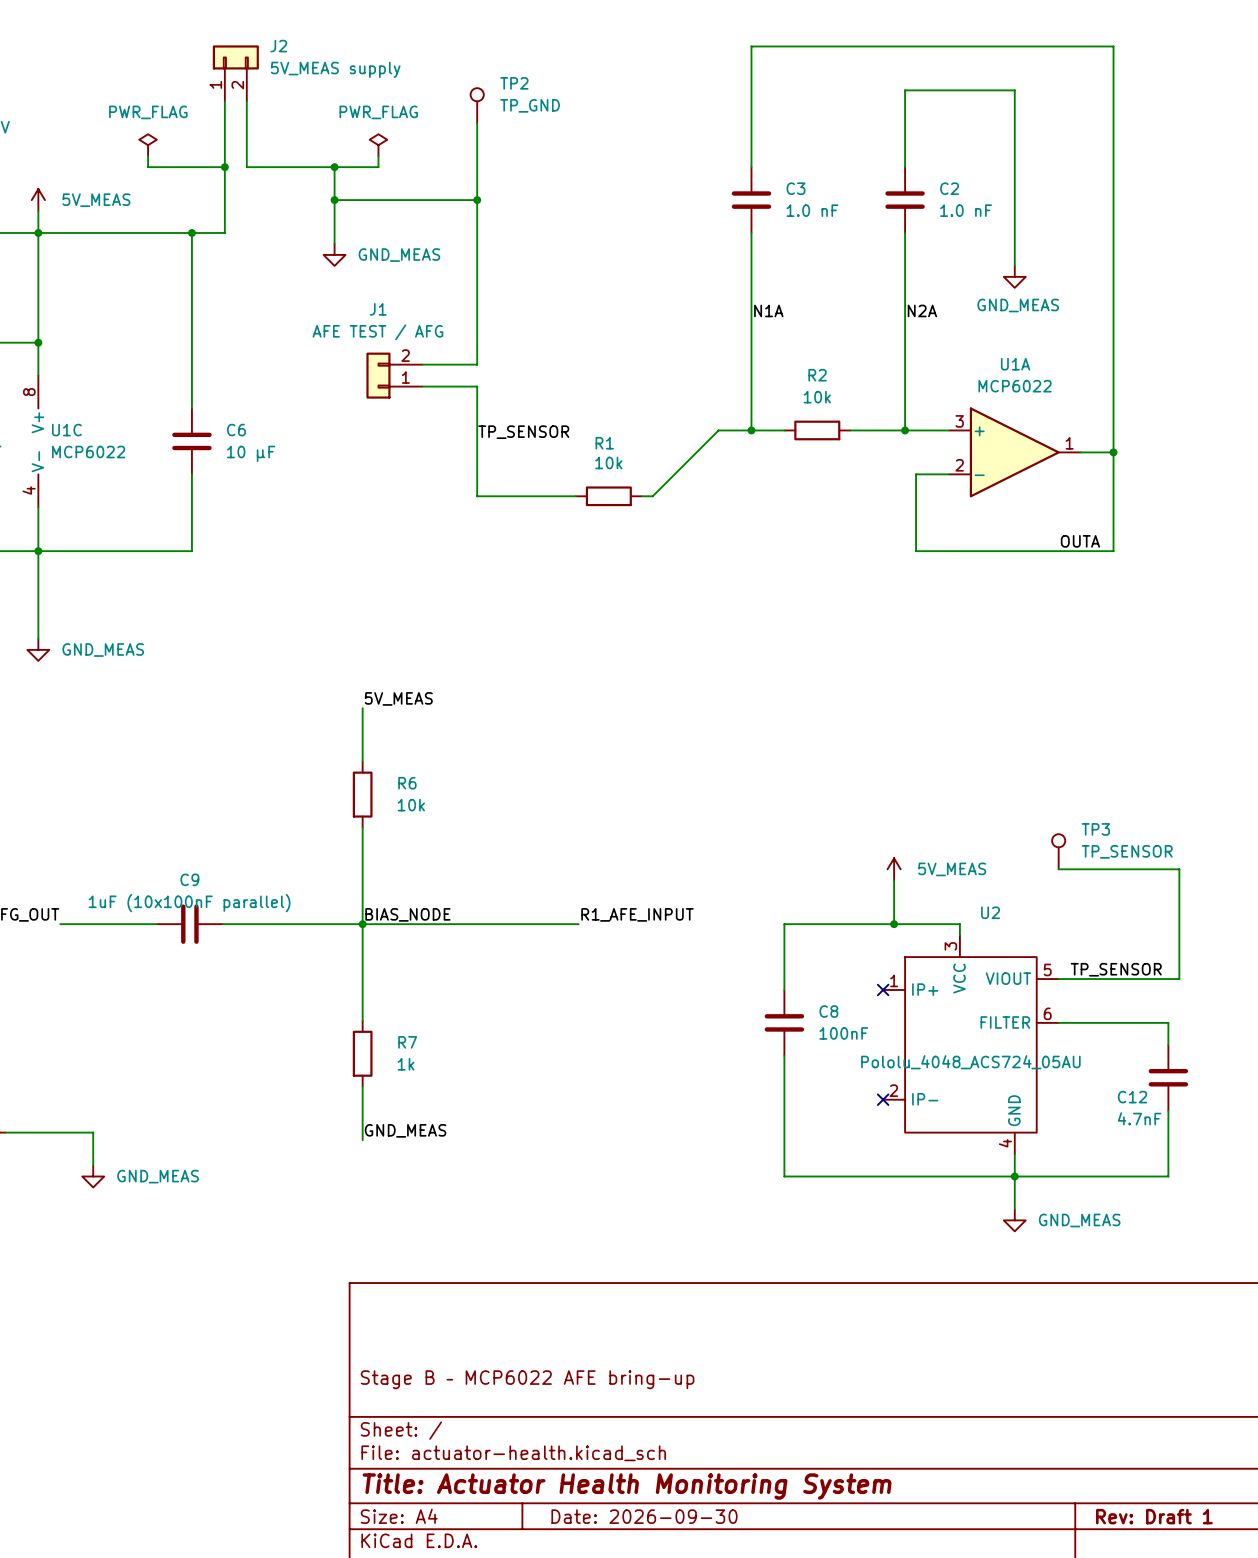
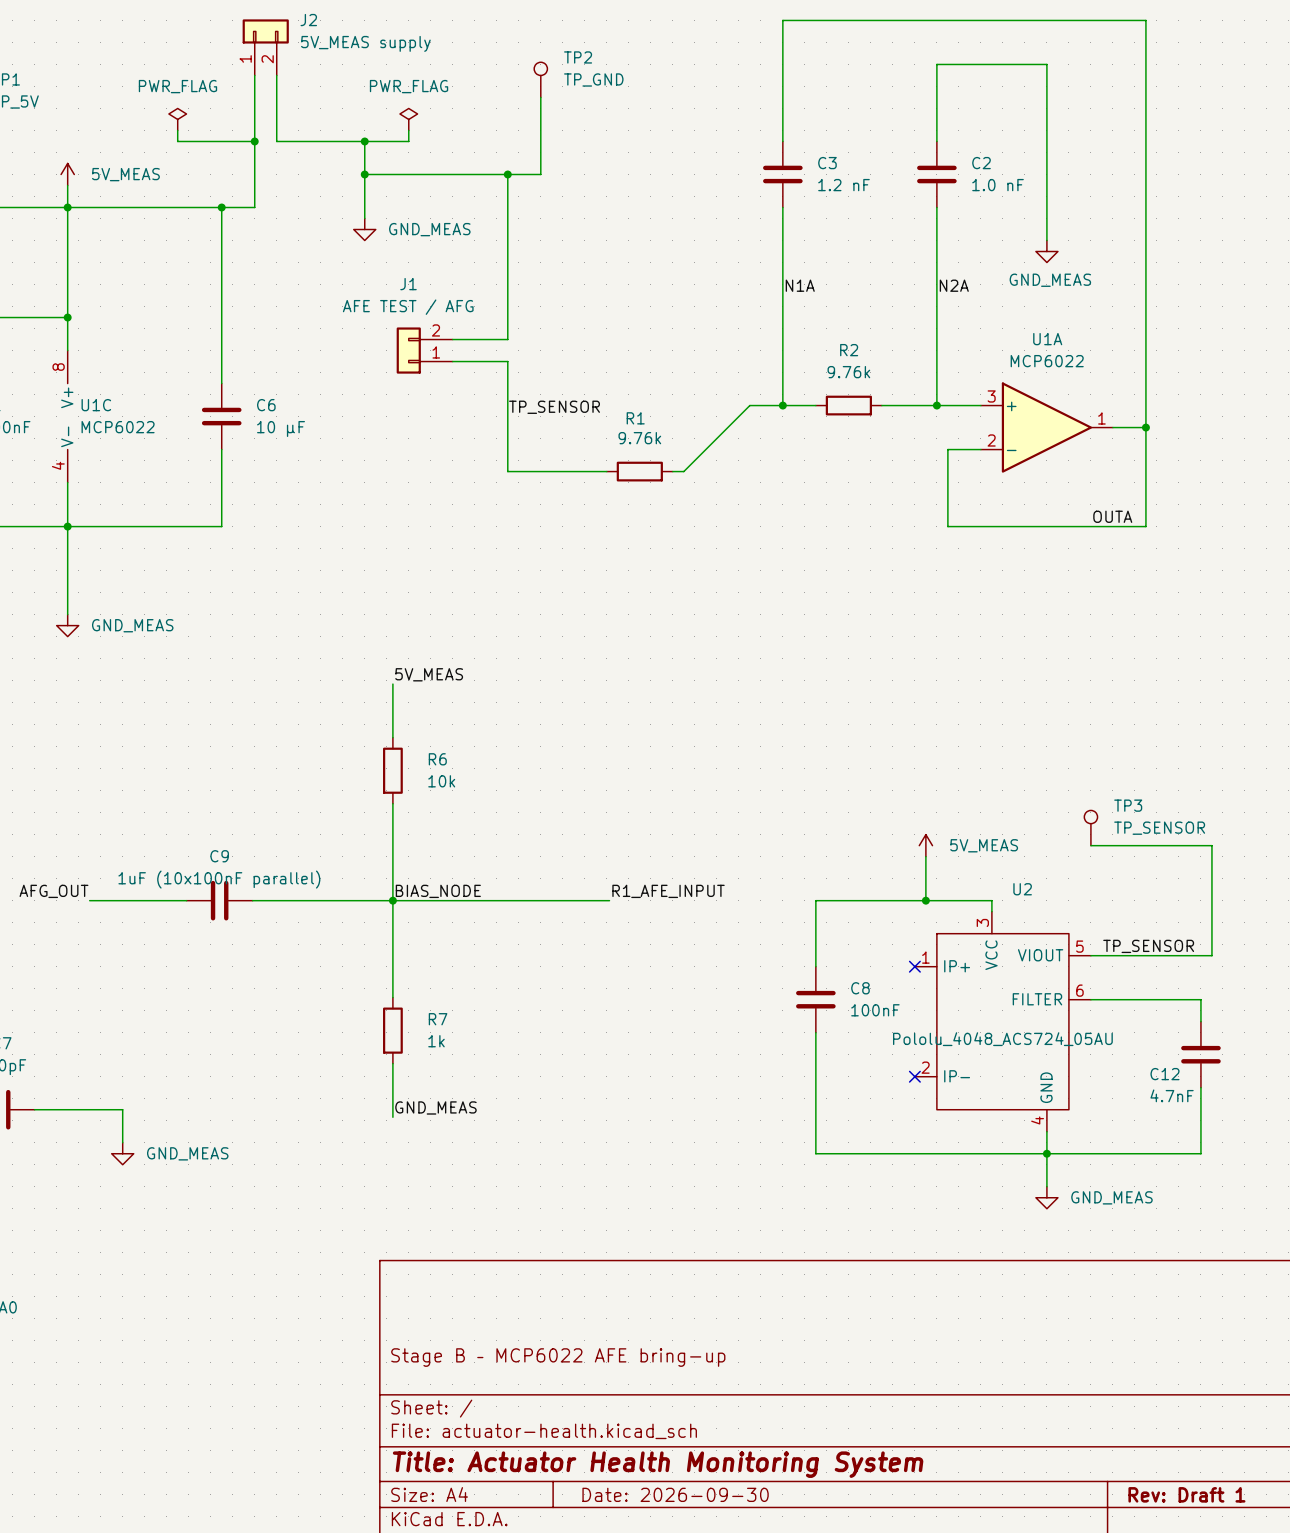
TP2 position: (477, 105) -> (540, 79)
wire: (477, 123) (477, 200) -> (540, 97) (540, 174) (507, 174)
C3 value: 1.0 nF (812, 210) -> 1.2 nF (843, 185)
R2 value: 10k (817, 397) -> 9.76k (848, 372)
R1 value: 10k (608, 462) -> 9.76k (639, 438)

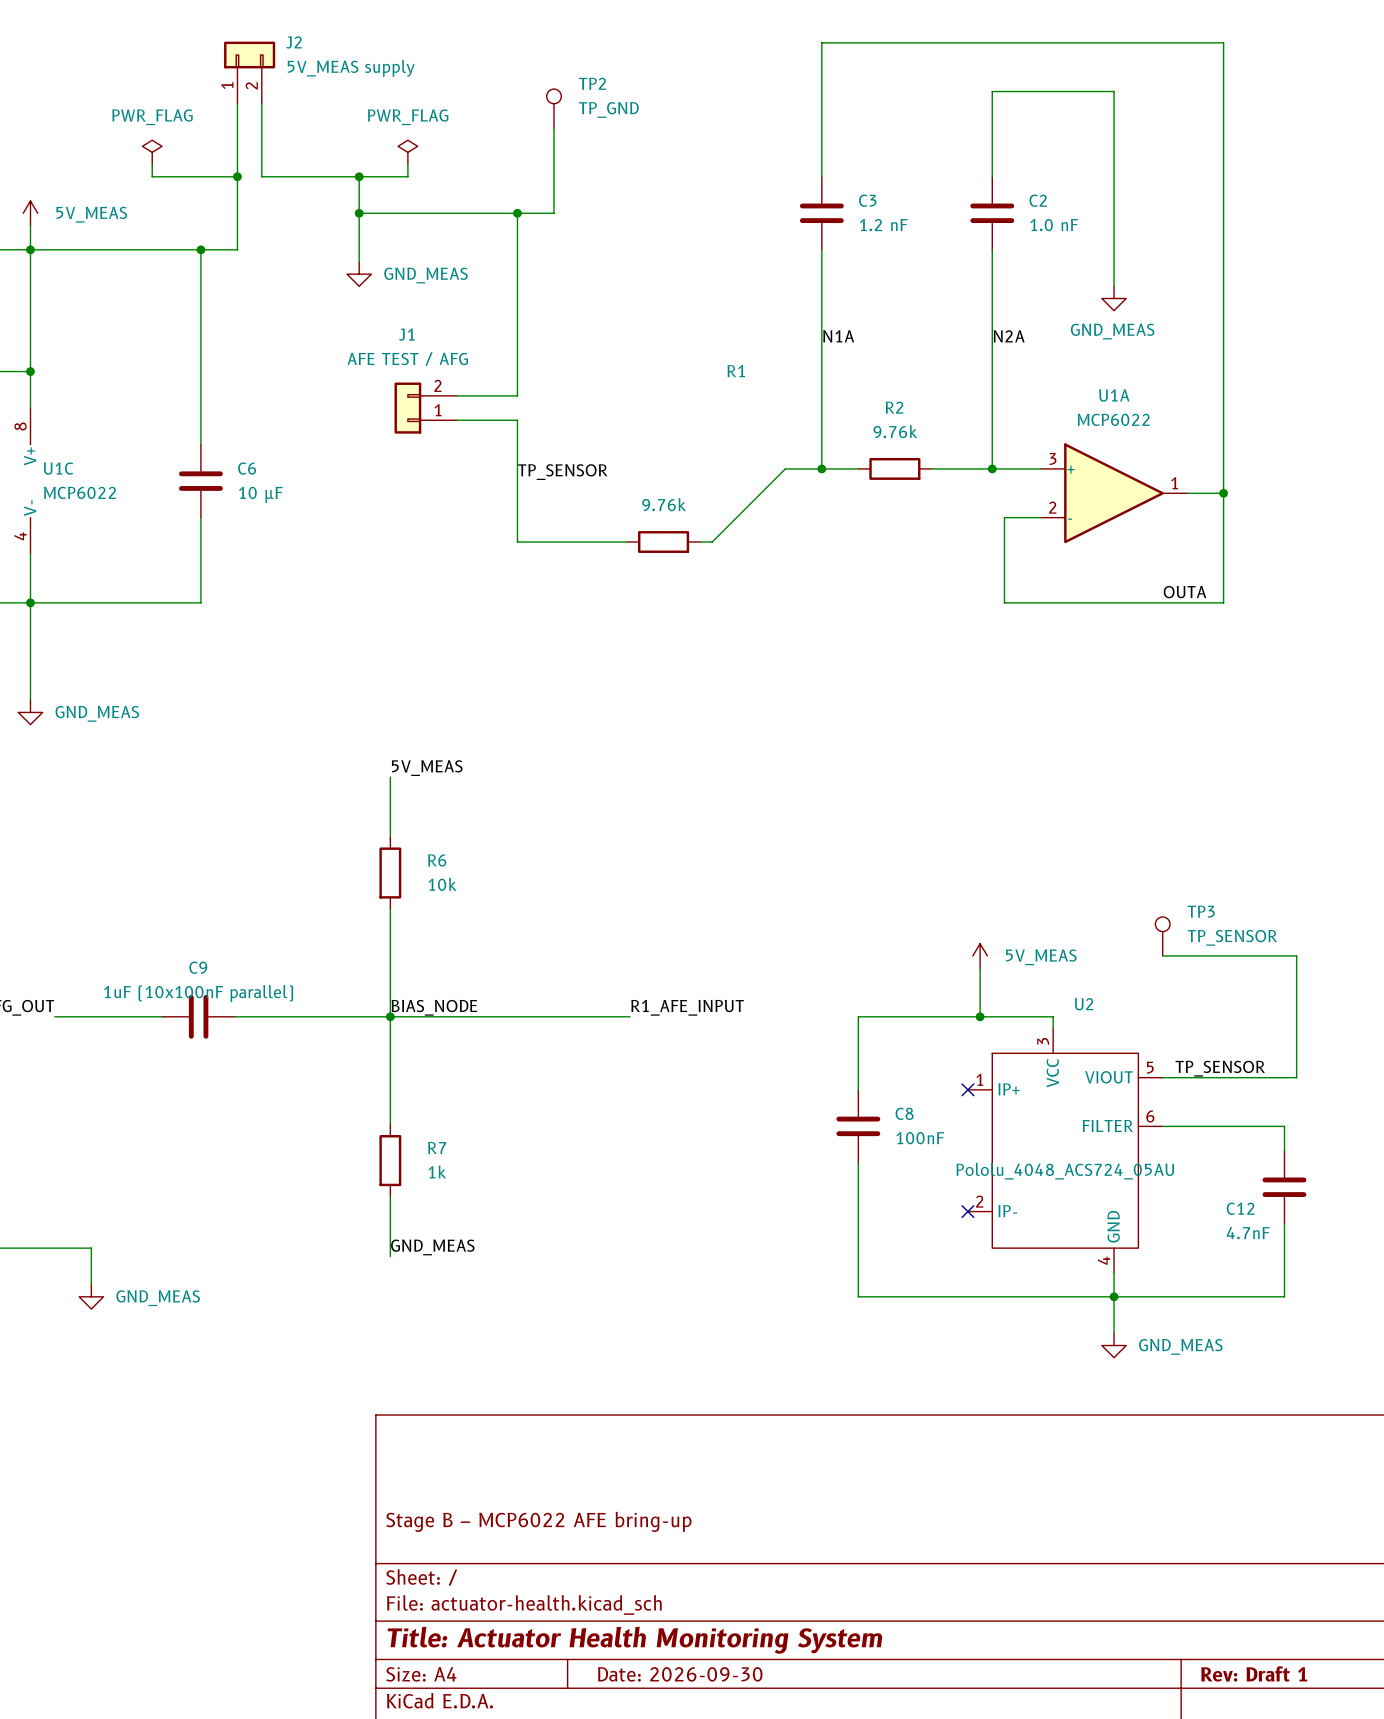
R1 name position: R1 (635, 418) -> R1 (736, 371)

